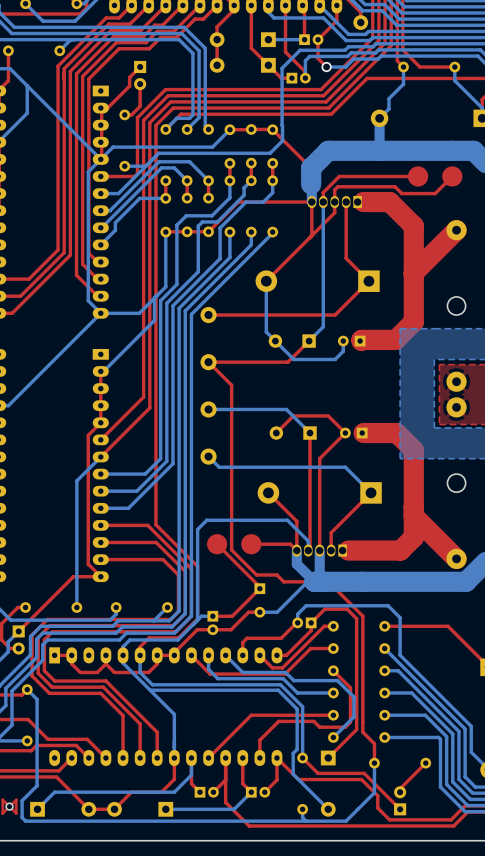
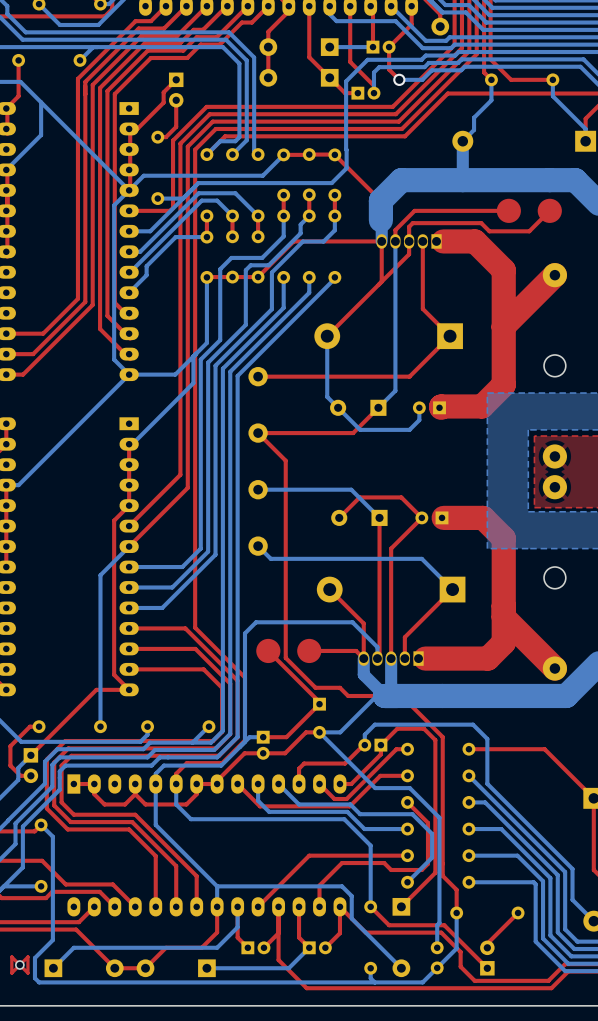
bottom track: none -> (319, 732) (375, 788) (409, 788) (439, 817) (439, 923) (437, 925) (437, 947)
bottom track: (123, 663) (174, 714) (174, 740) -> none
bottom track: (150, 690) (278, 690) (297, 709) (297, 749) (293, 753) (293, 774) -> (155, 793) (155, 824) (217, 886) (342, 886) (351, 896) (351, 918) (359, 926)
part: none -> (437, 957)

